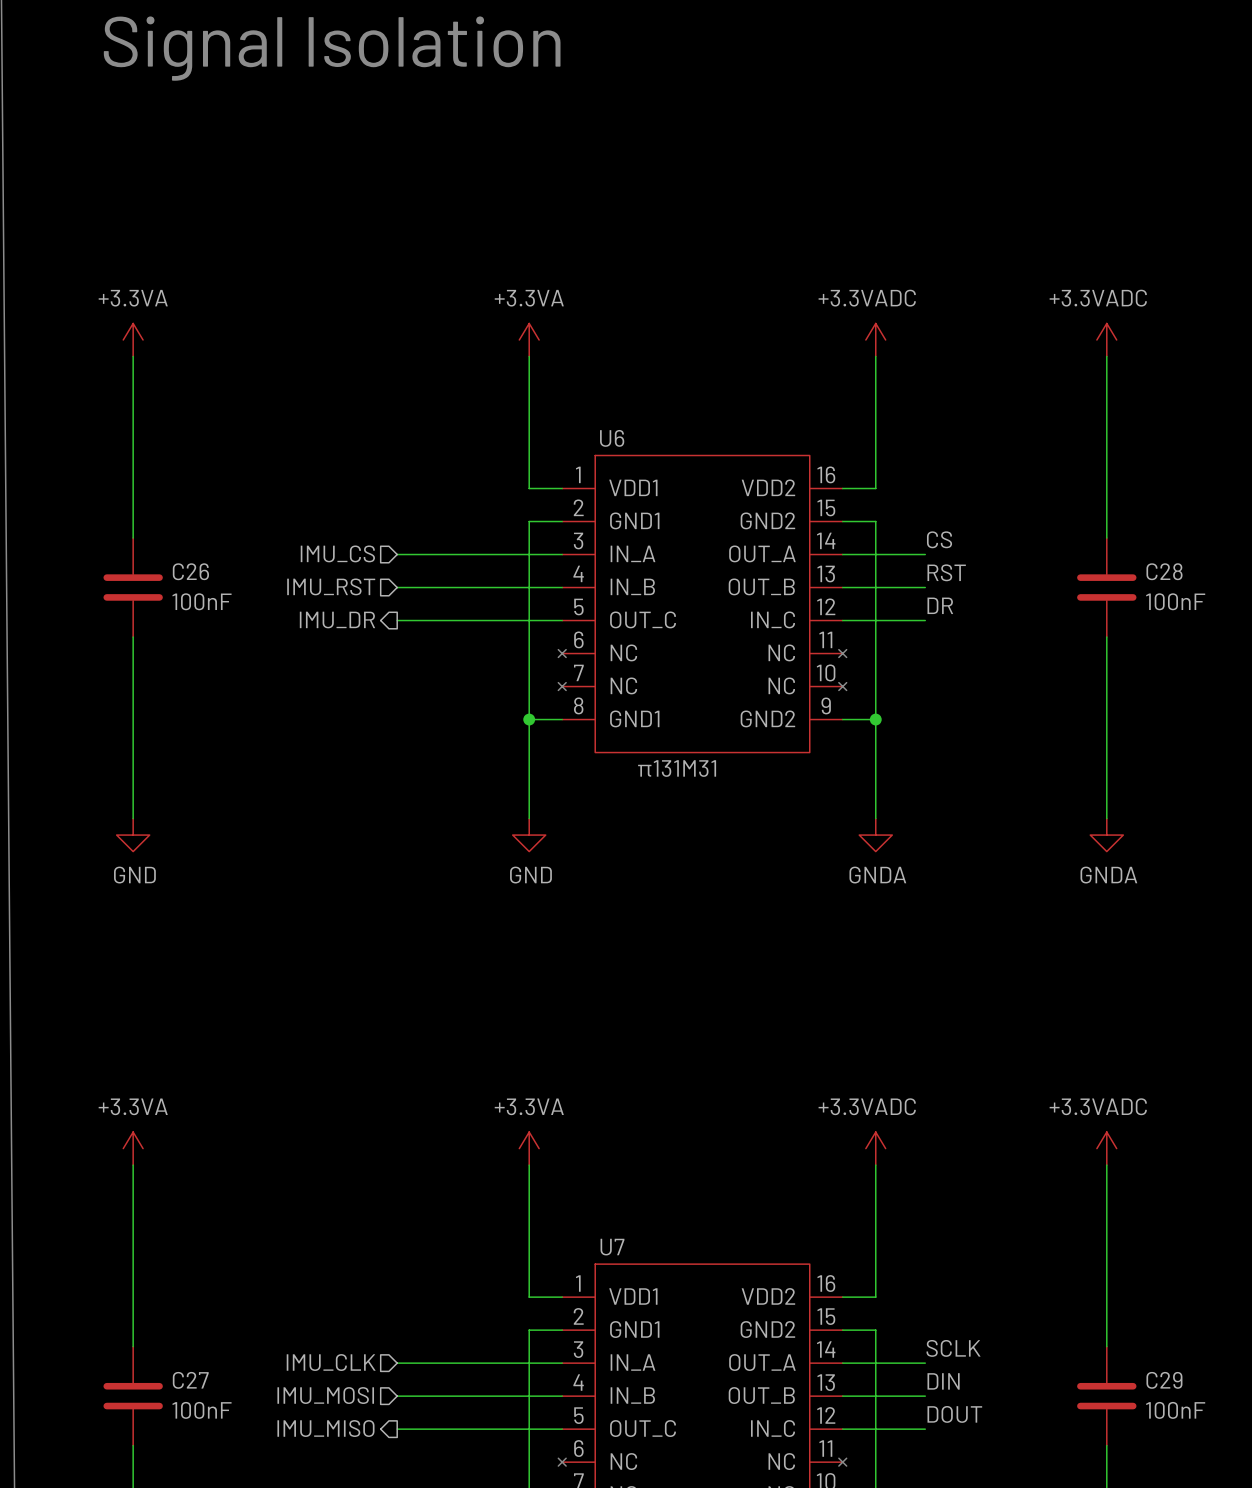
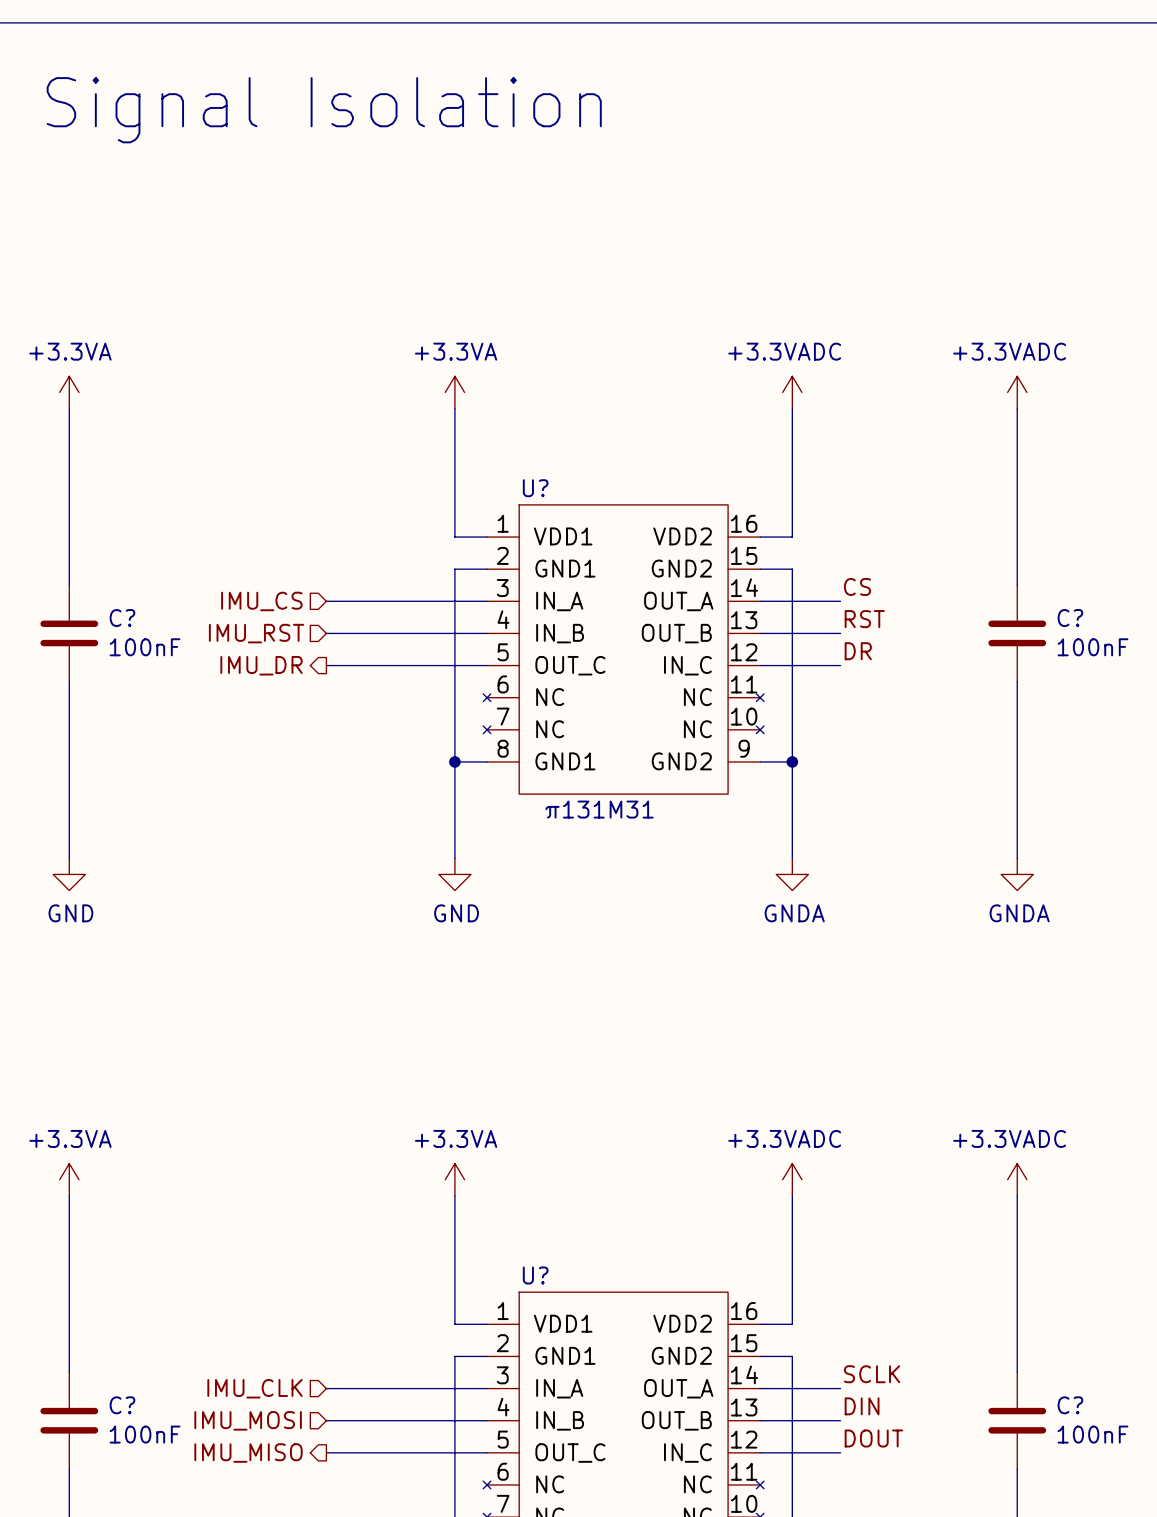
U6 name: U6 (612, 438) -> U? (535, 488)
C26 name: C26 (190, 571) -> C? (122, 618)
C28 name: C28 (1164, 571) -> C? (1070, 618)
U7 name: U7 (612, 1247) -> U? (535, 1275)
C27 name: C27 (190, 1380) -> C? (122, 1405)
C29 name: C29 (1164, 1380) -> C? (1070, 1405)

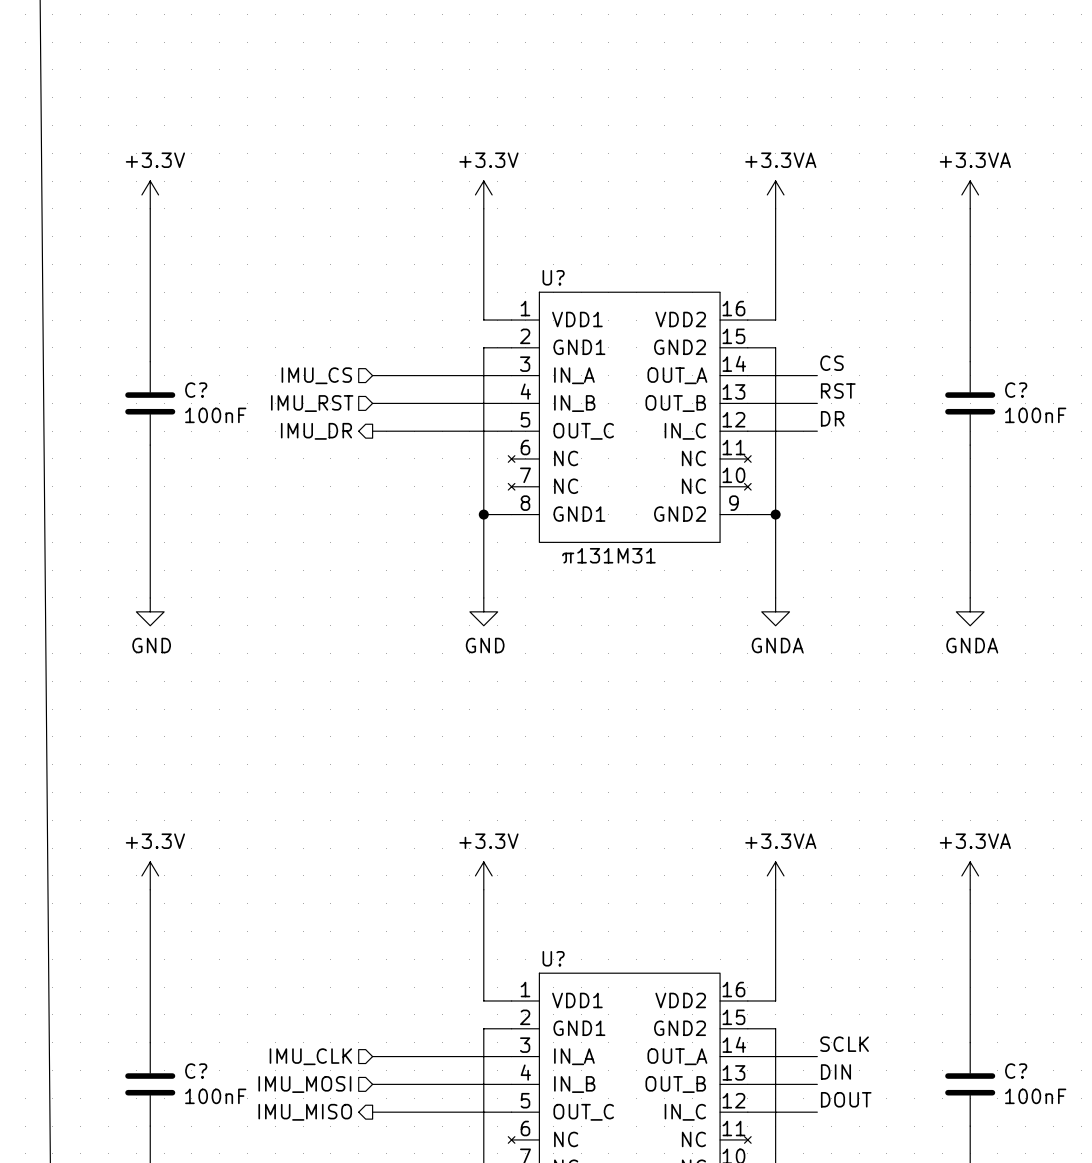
power symbol: +3.3VA (69, 392) -> +3.3V (150, 194)
power symbol: +3.3VA (454, 392) -> +3.3V (483, 194)
power symbol: +3.3VADC (792, 392) -> +3.3VA (775, 194)
power symbol: +3.3VADC (1017, 392) -> +3.3VA (970, 194)
power symbol: +3.3VA (69, 1179) -> +3.3V (150, 875)
power symbol: +3.3VA (454, 1179) -> +3.3V (483, 875)
power symbol: +3.3VADC (792, 1179) -> +3.3VA (775, 875)
power symbol: +3.3VADC (1017, 1179) -> +3.3VA (970, 875)

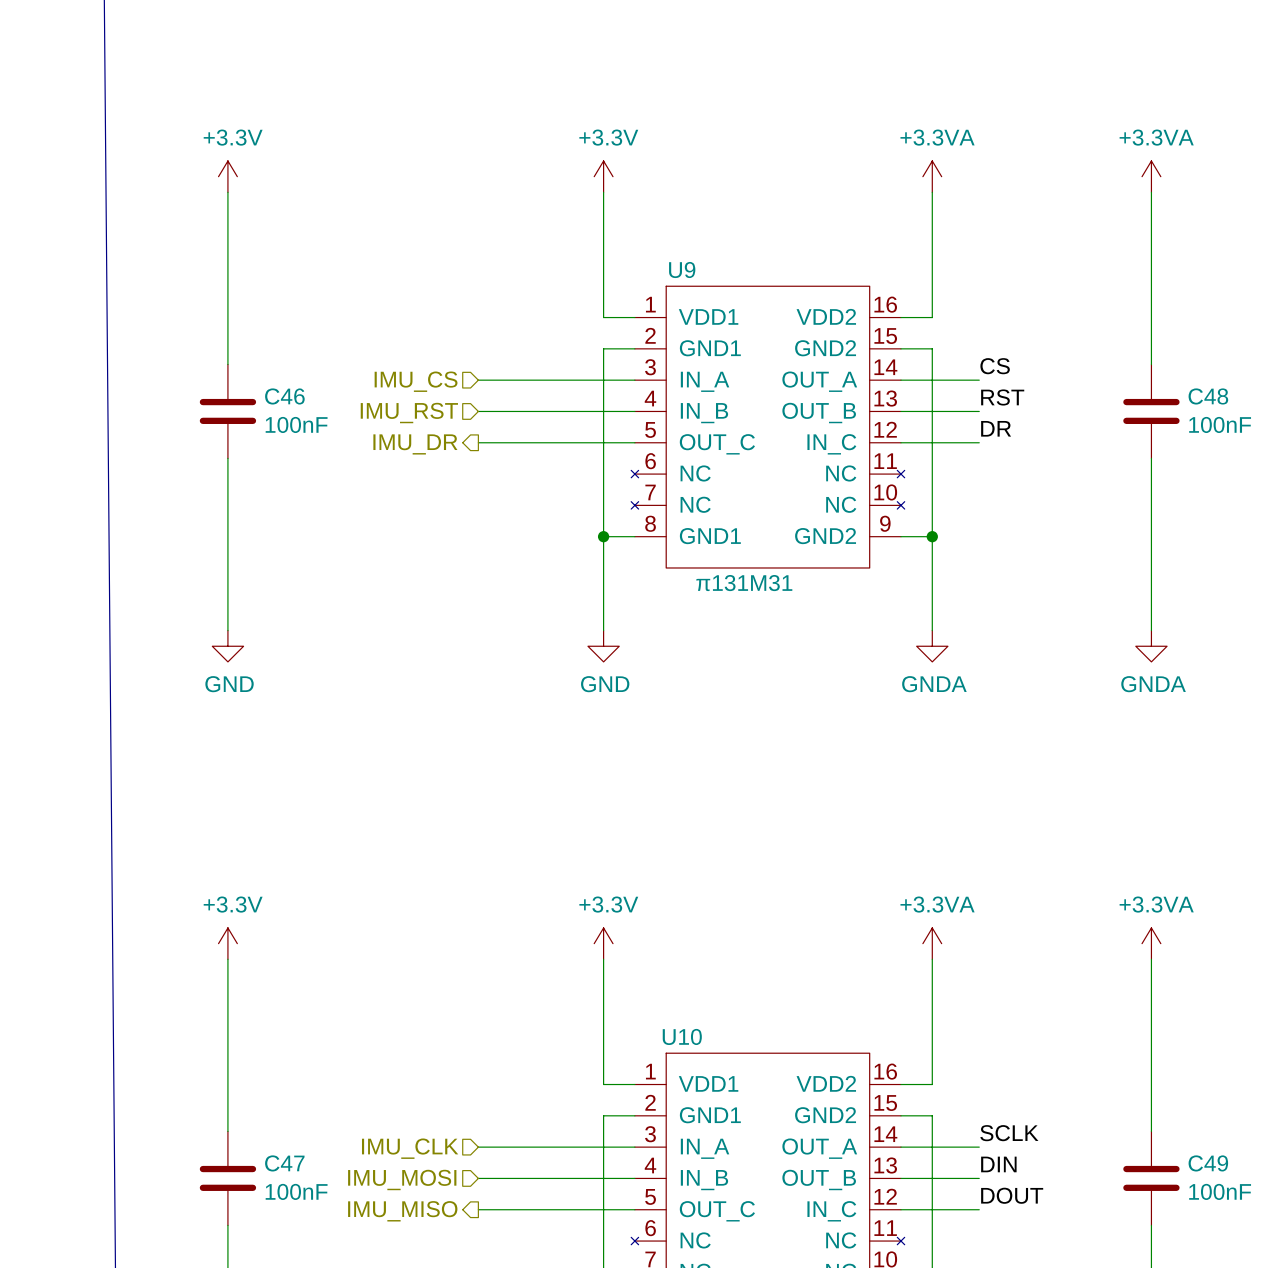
U? name: U? (553, 277) -> U9 (682, 270)
C? name: C? (196, 390) -> C46 (284, 396)
C? name: C? (1016, 390) -> C48 (1208, 396)
U? name: U? (553, 958) -> U10 (682, 1036)
C? name: C? (196, 1071) -> C47 (284, 1163)
C? name: C? (1016, 1071) -> C49 (1208, 1163)

